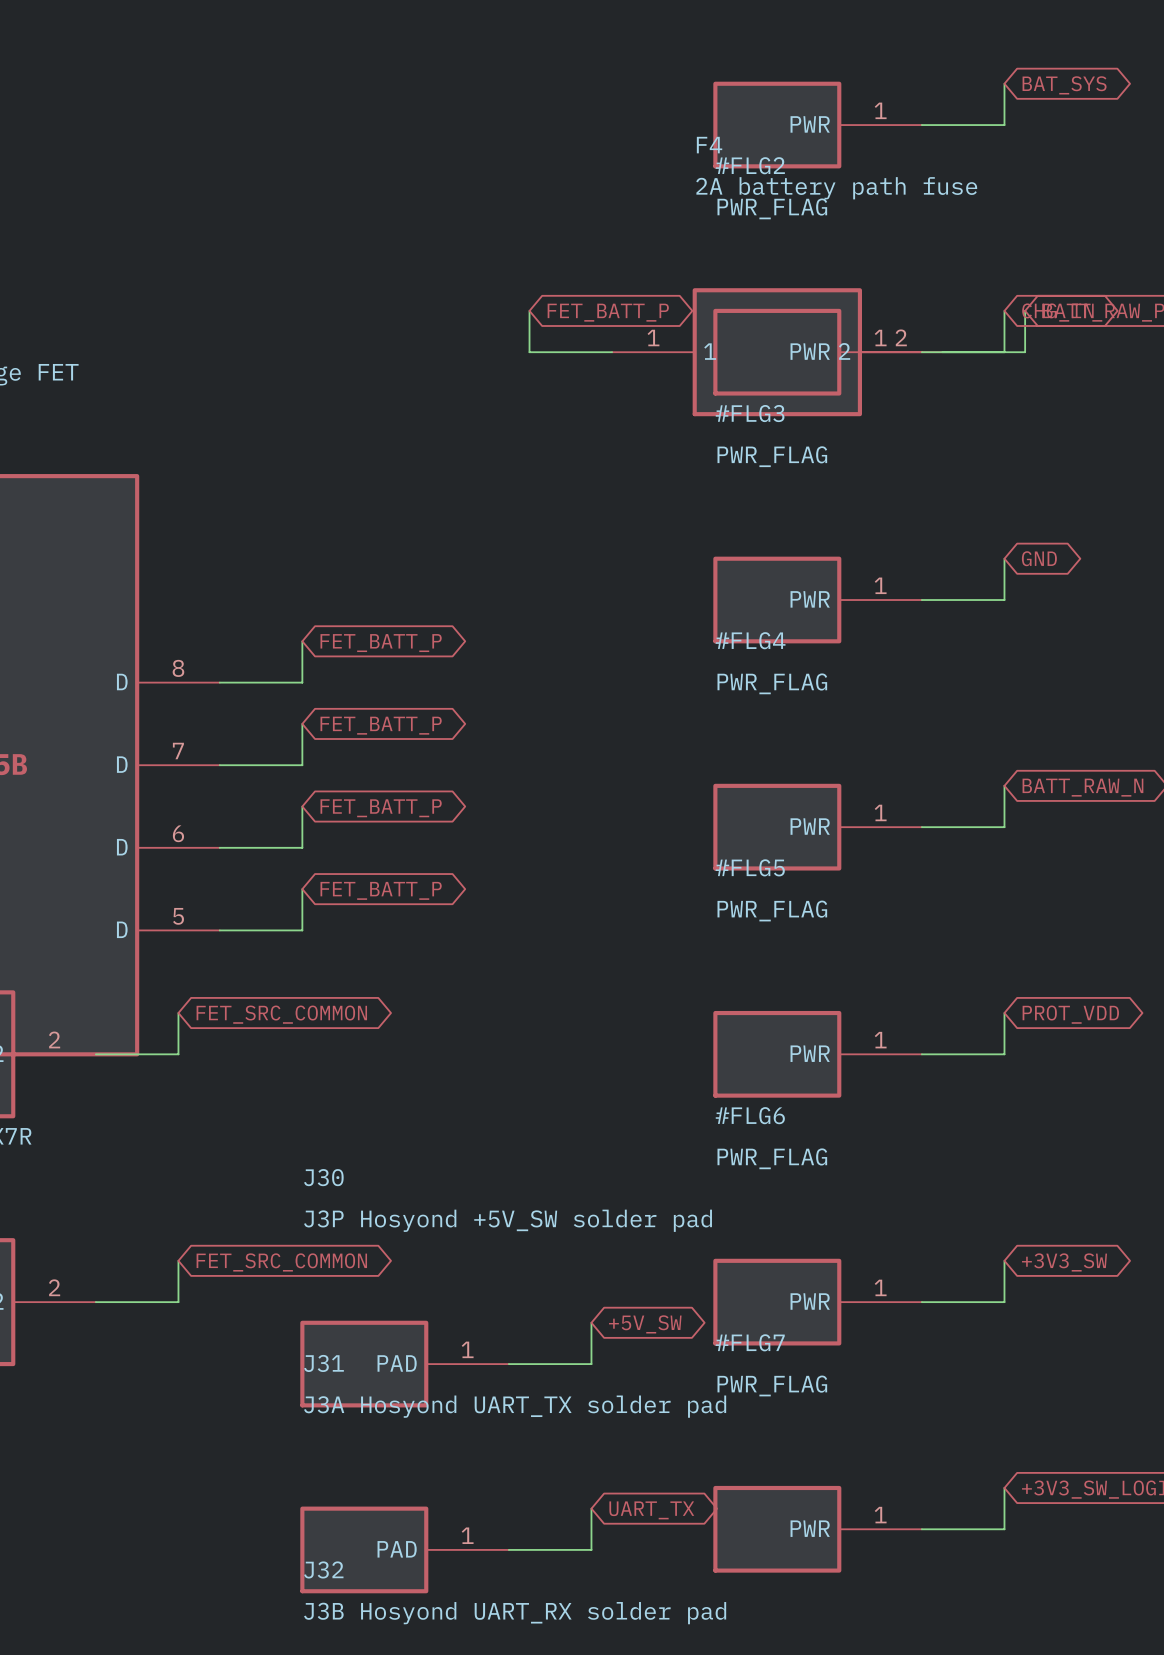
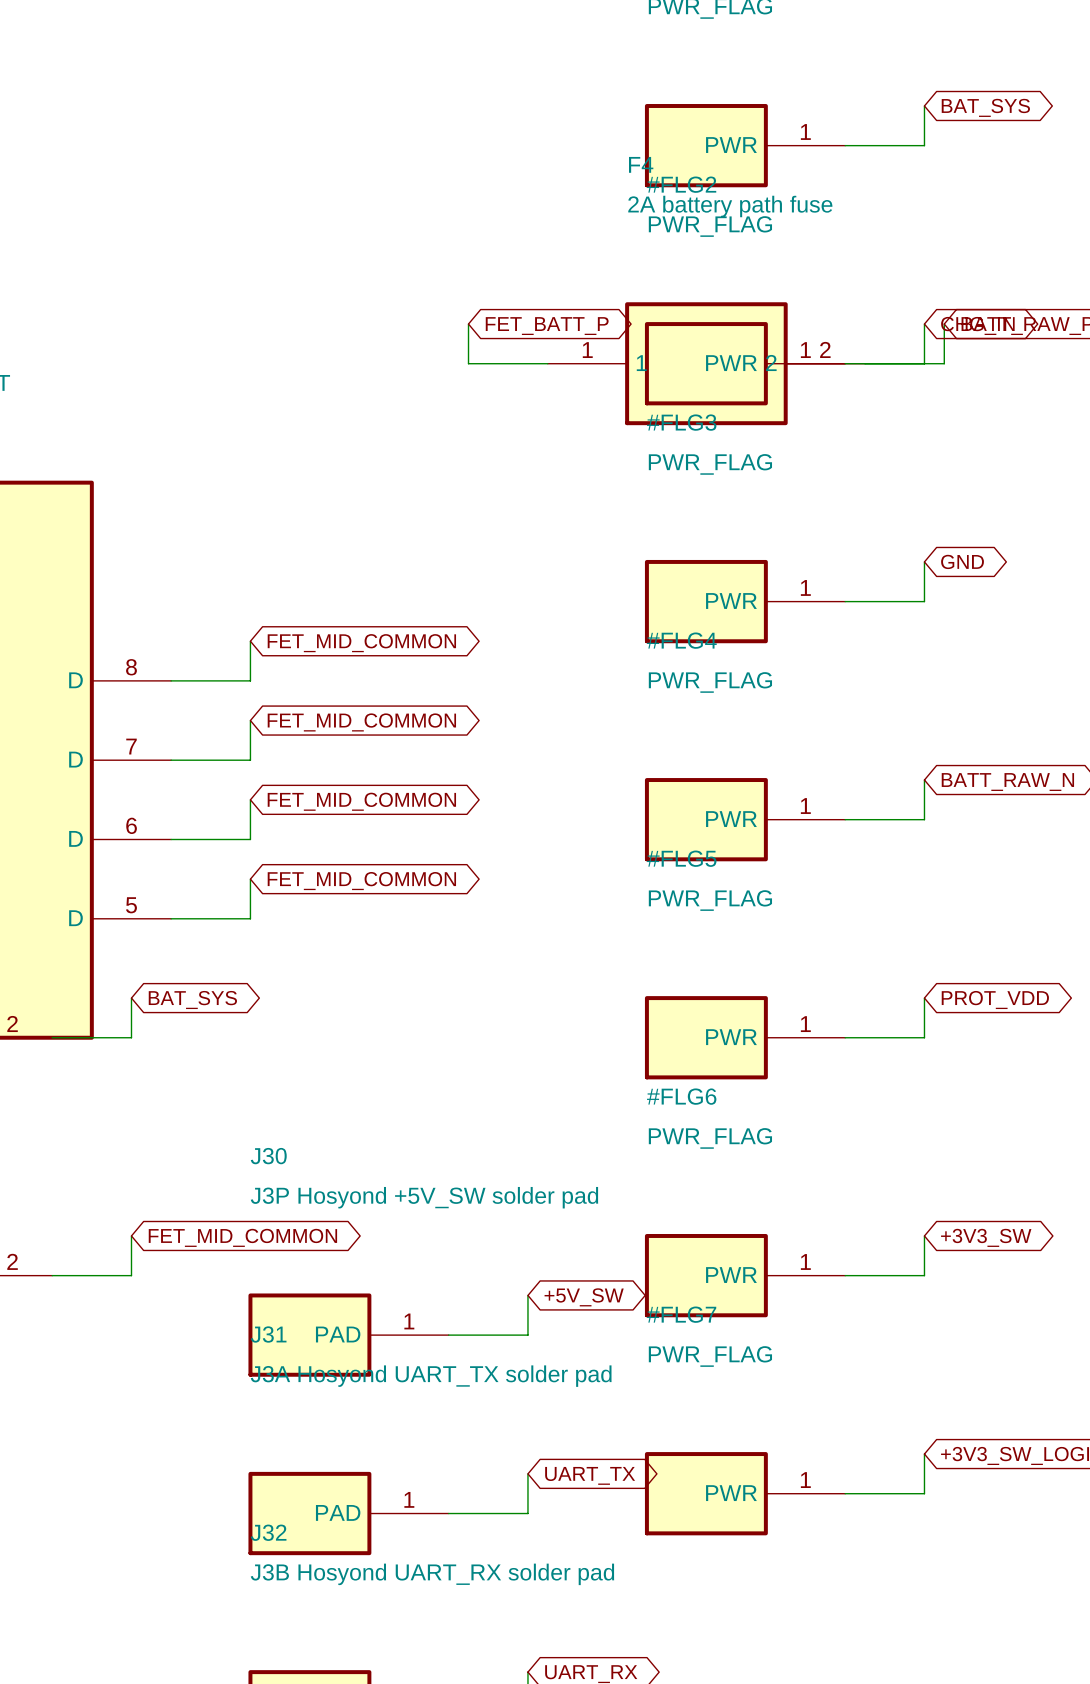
global label: FET_BATT_P (381, 643) -> FET_MID_COMMON (361, 643)
global label: FET_BATT_P (381, 725) -> FET_MID_COMMON (361, 722)
global label: FET_BATT_P (381, 808) -> FET_MID_COMMON (361, 801)
global label: FET_BATT_P (381, 890) -> FET_MID_COMMON (361, 881)
global label: FET_SRC_COMMON (281, 1014) -> BAT_SYS (192, 999)
global label: FET_SRC_COMMON (281, 1262) -> FET_MID_COMMON (242, 1237)

